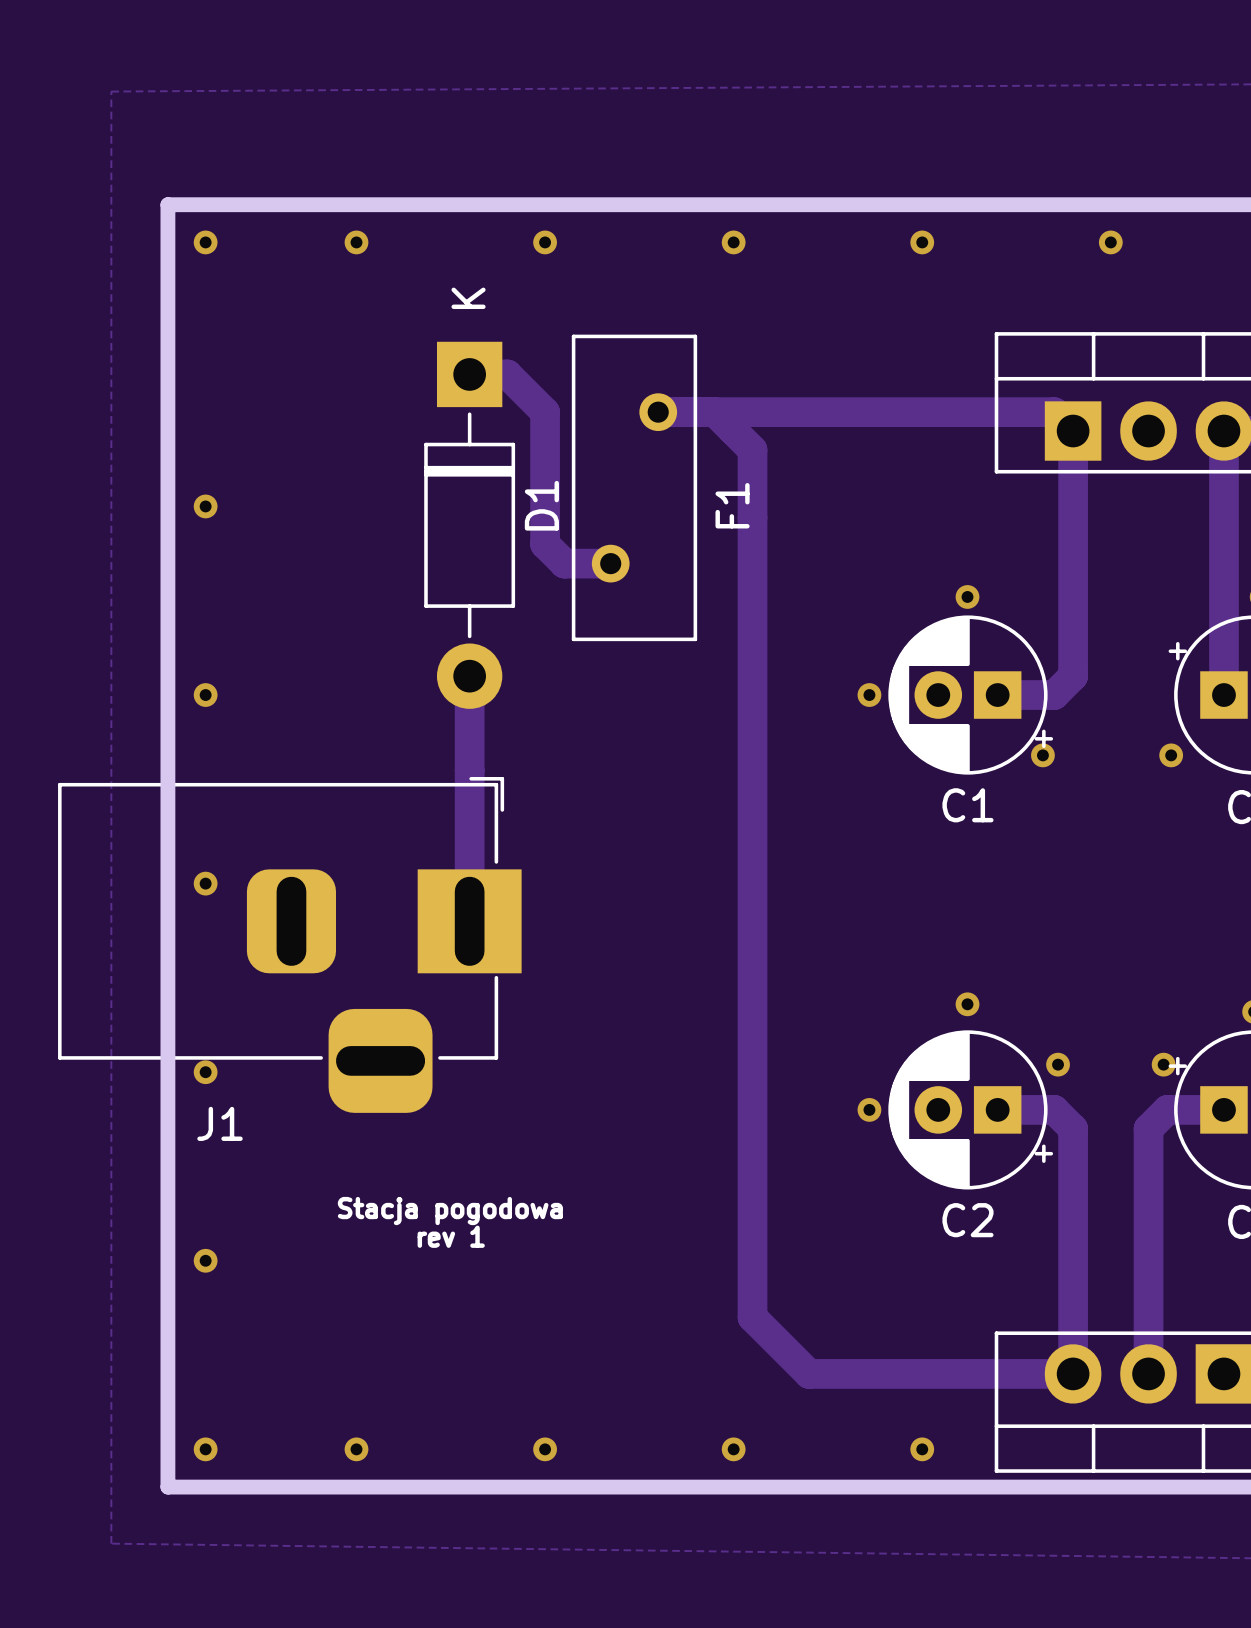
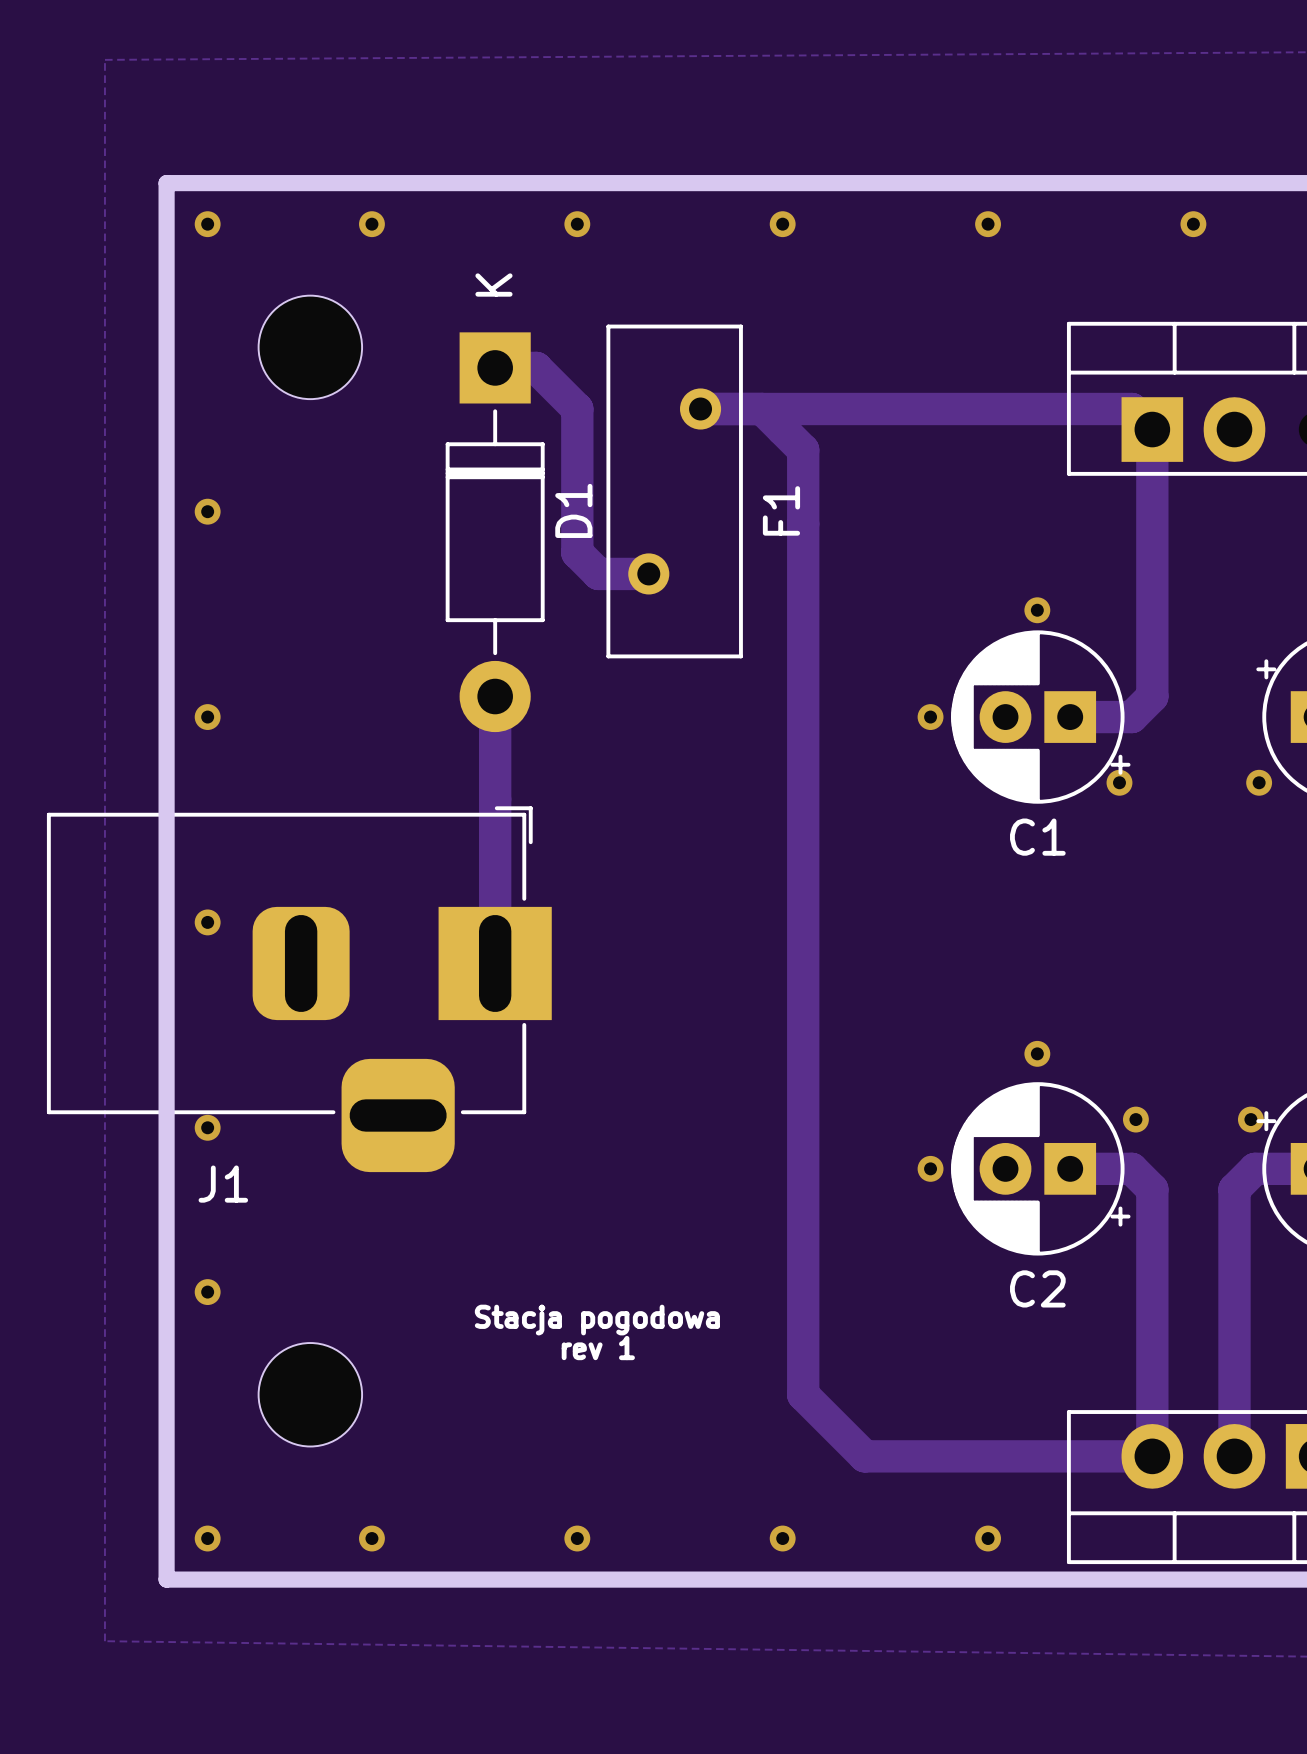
part: none -> (310, 347)
text position: Stacja pogodowa (450, 1211) -> Stacja pogodowa (597, 1320)
text position: rev 1 (451, 1236) -> rev 1 (598, 1348)
via position: (205, 1260) -> (207, 1292)
part: none -> (310, 1394)

